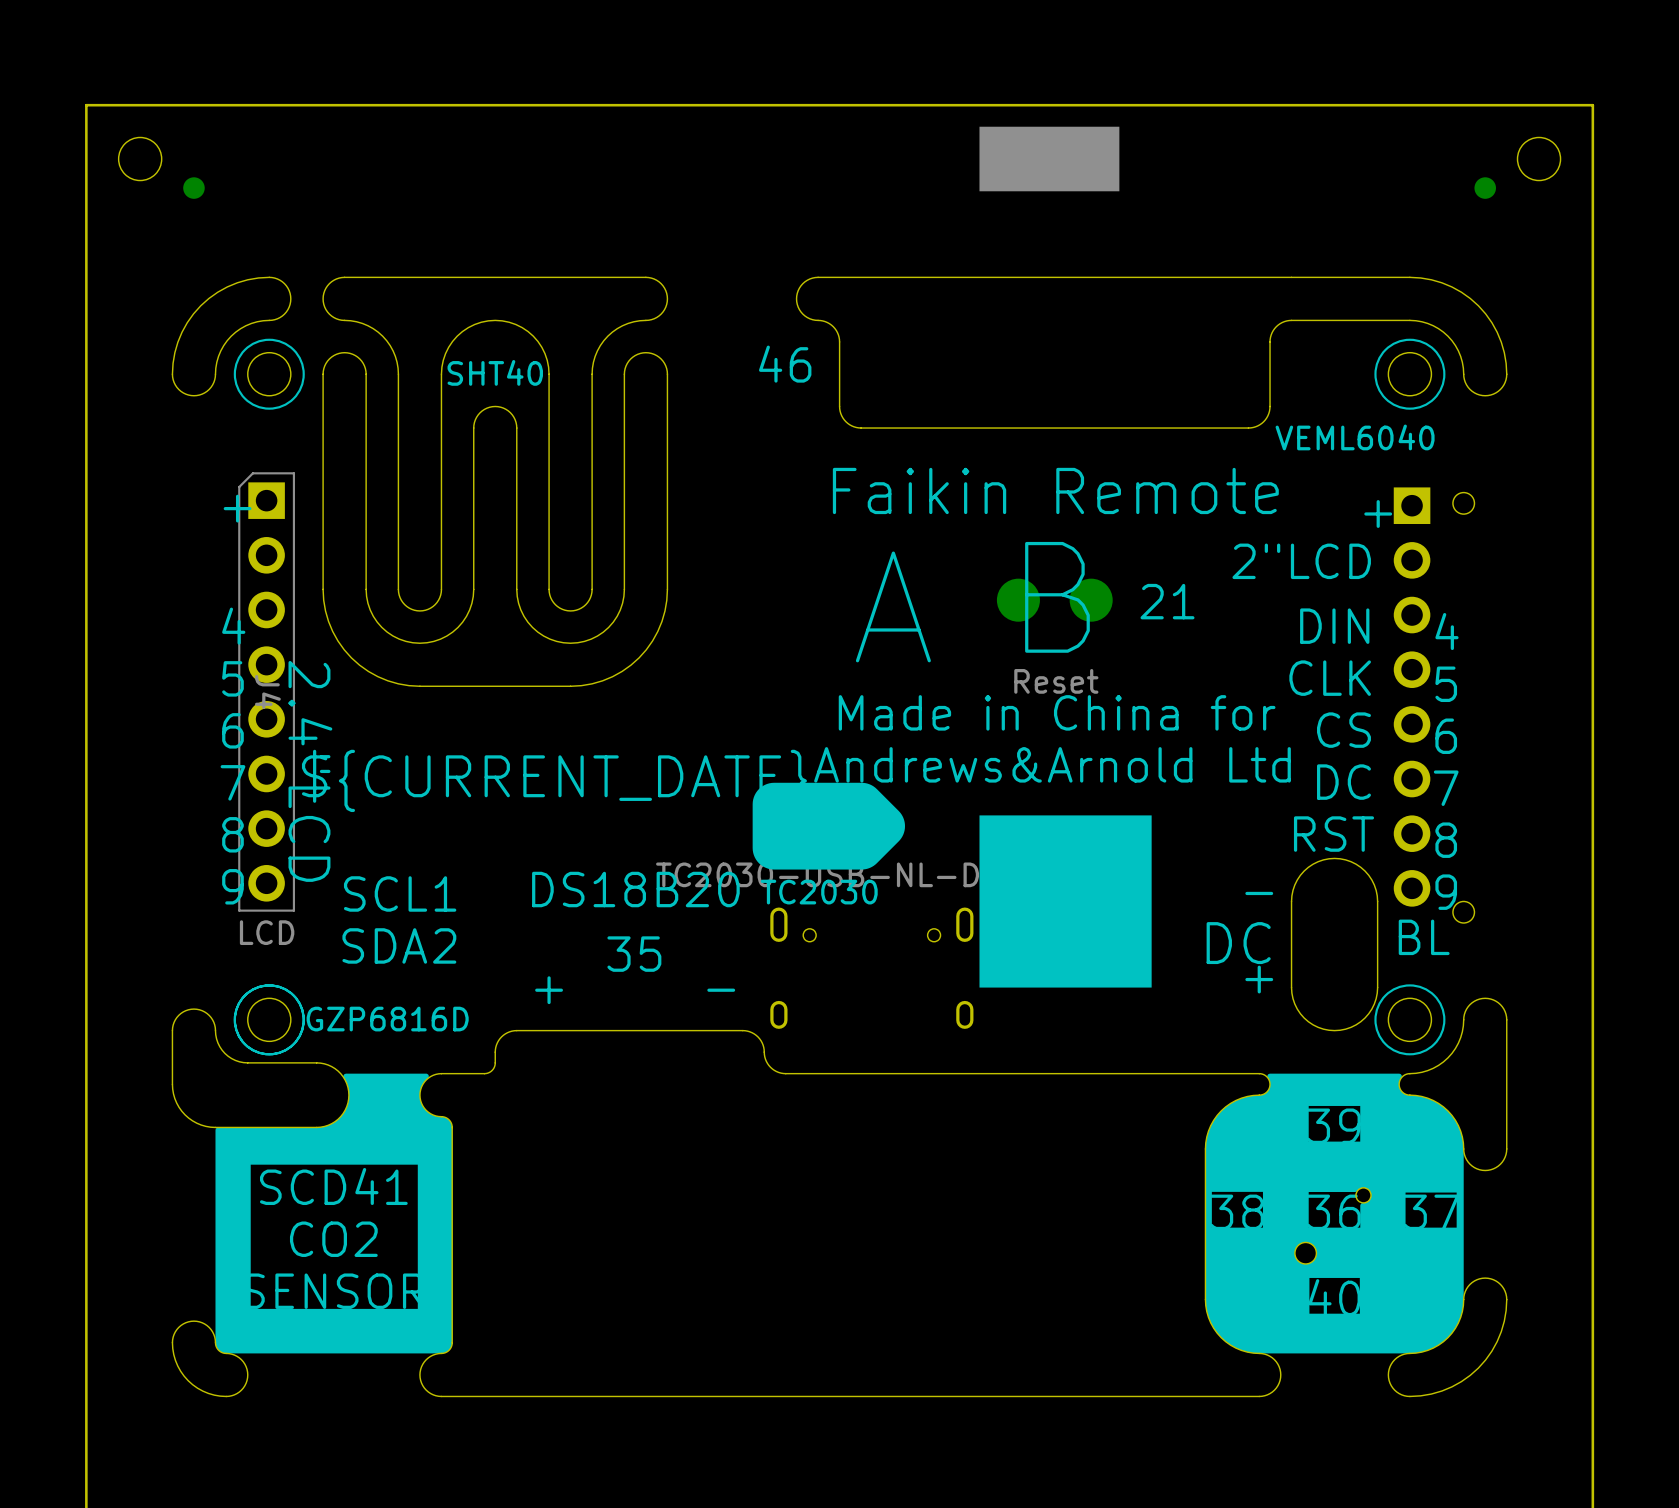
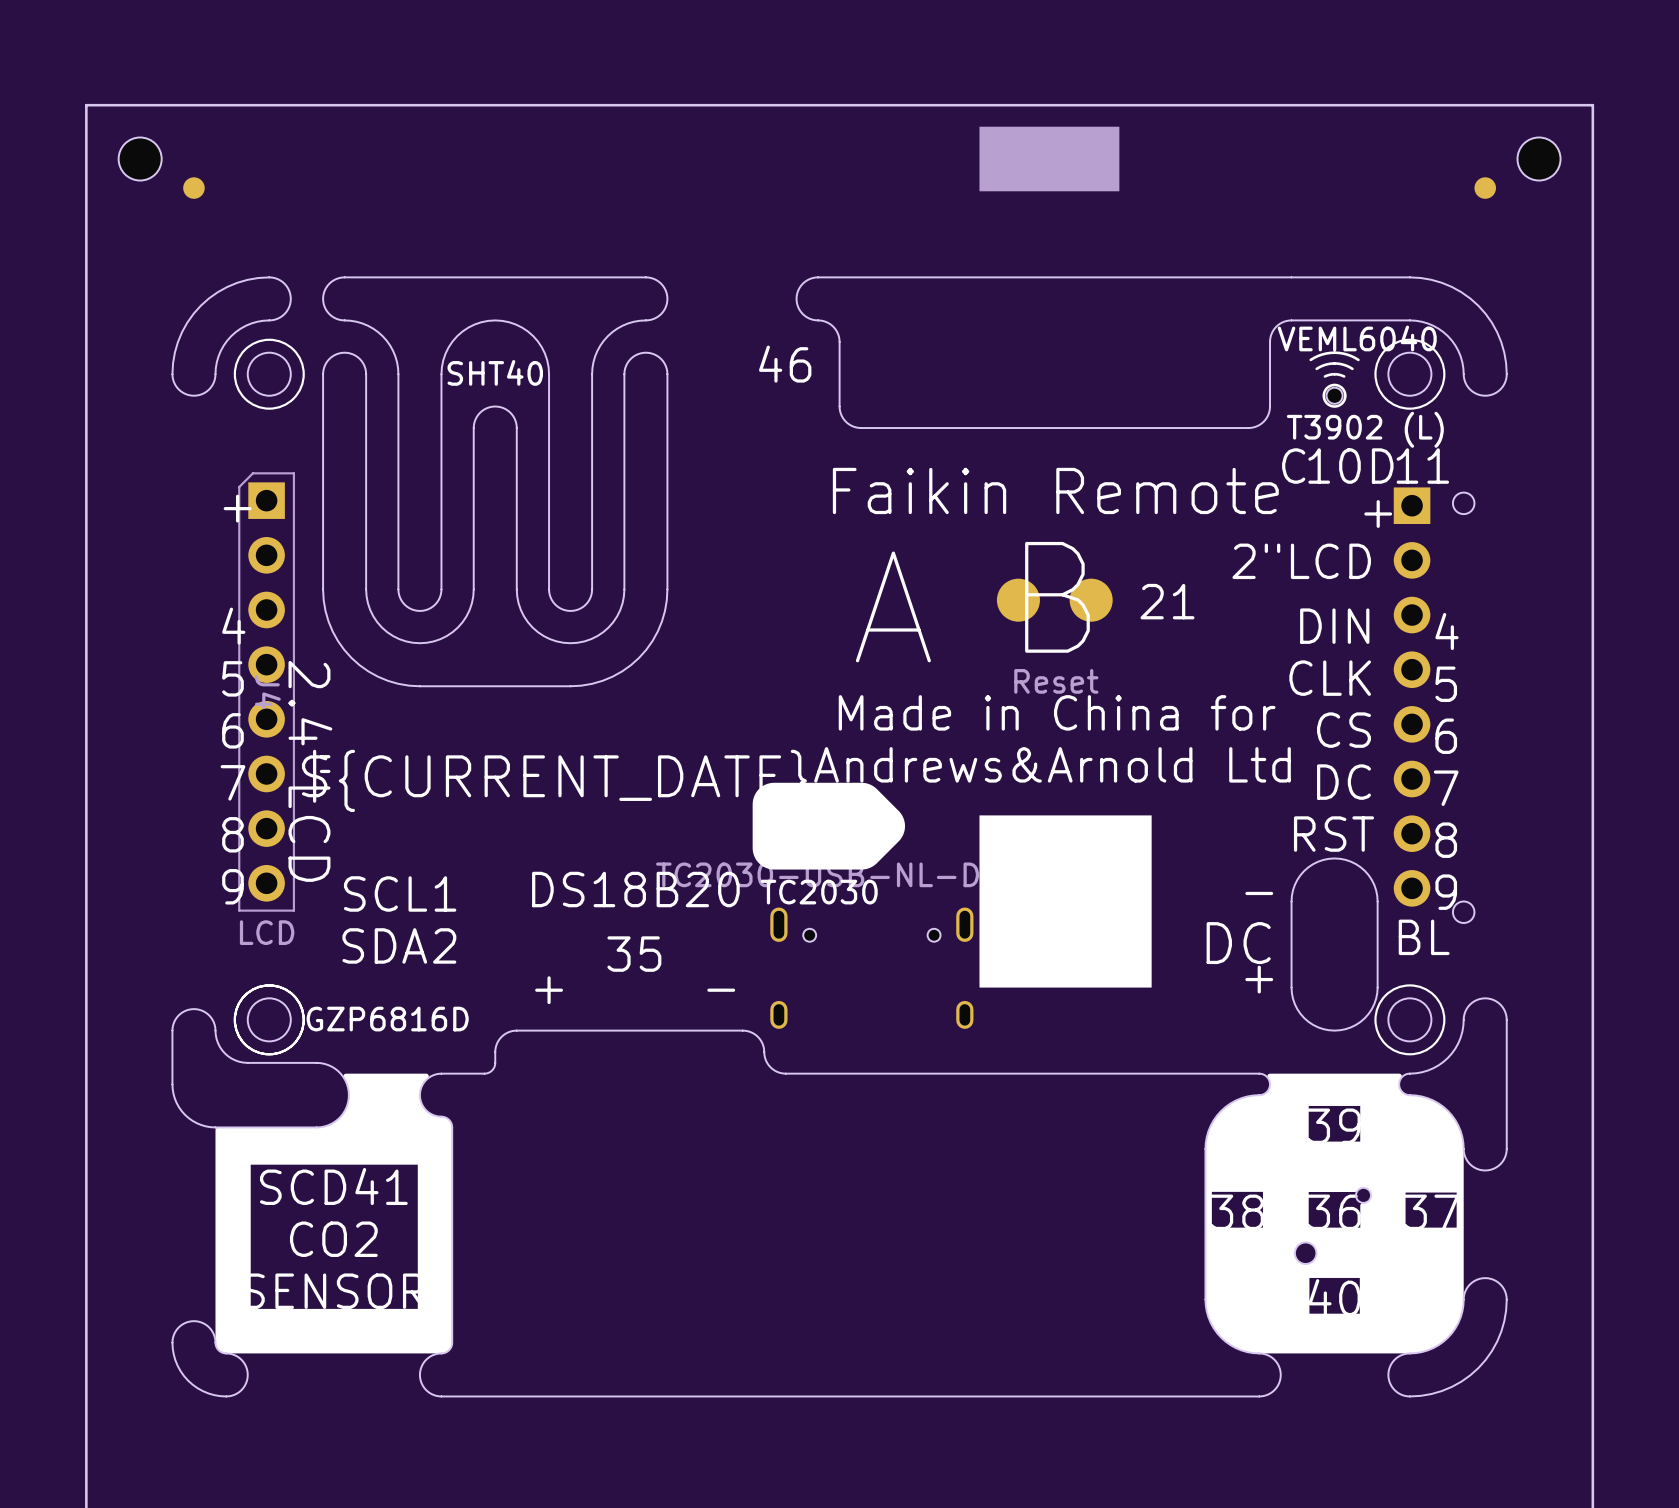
text: none -> VEML6040 (1357, 338)
line: none -> (1358, 359) (1347, 354) (1334, 352) (1322, 354) (1310, 359)
line: none -> (1352, 368) (1334, 363) (1316, 368)
line: none -> (1344, 376) (1334, 374) (1324, 376)
drawing: none -> [1322, 383, 1347, 408]
part: none -> (1334, 395)
text: VEML6040 (1355, 437) -> T3902 (L) (1365, 429)
text: none -> C (1293, 466)
text: none -> 10 (1334, 466)
text: none -> D (1382, 466)
text: none -> 11 (1422, 466)

